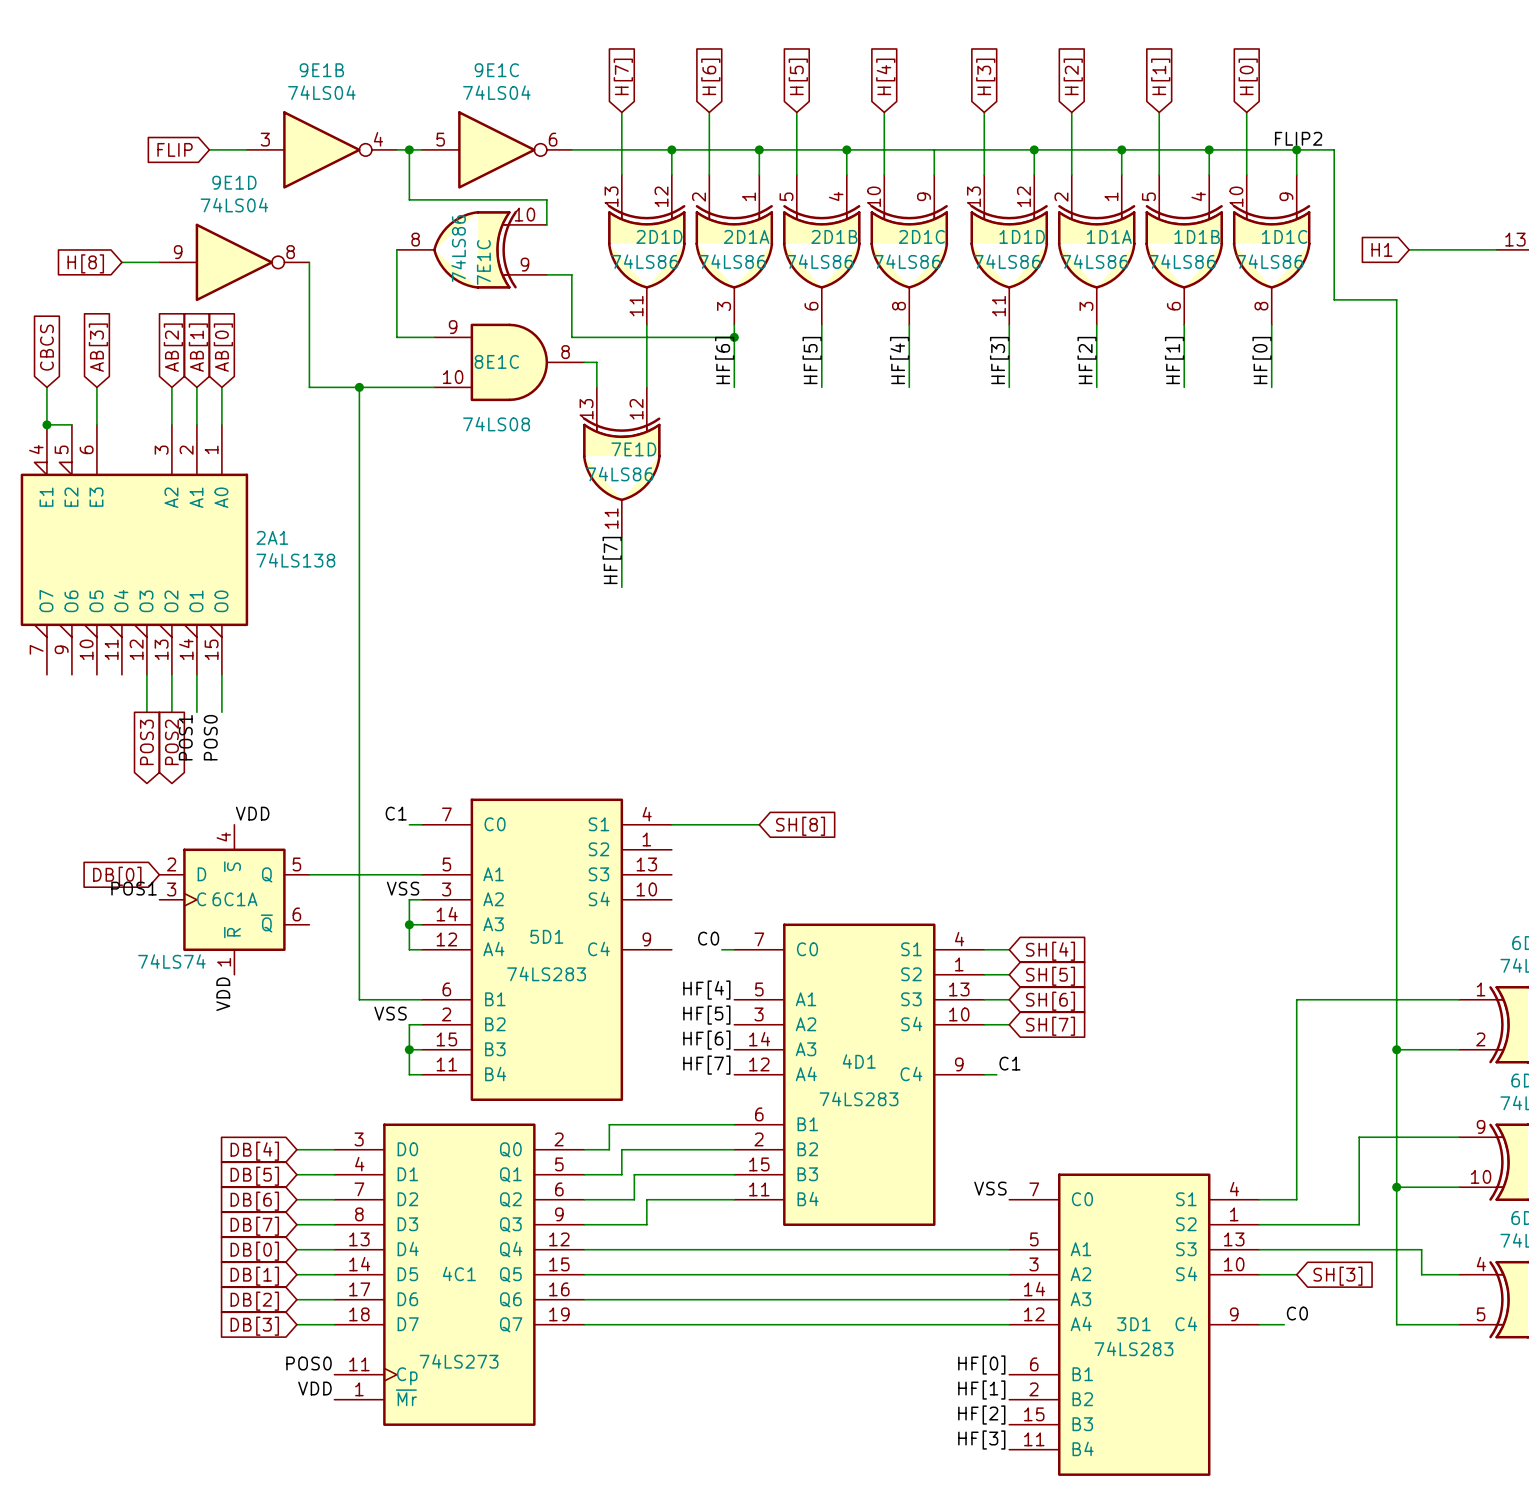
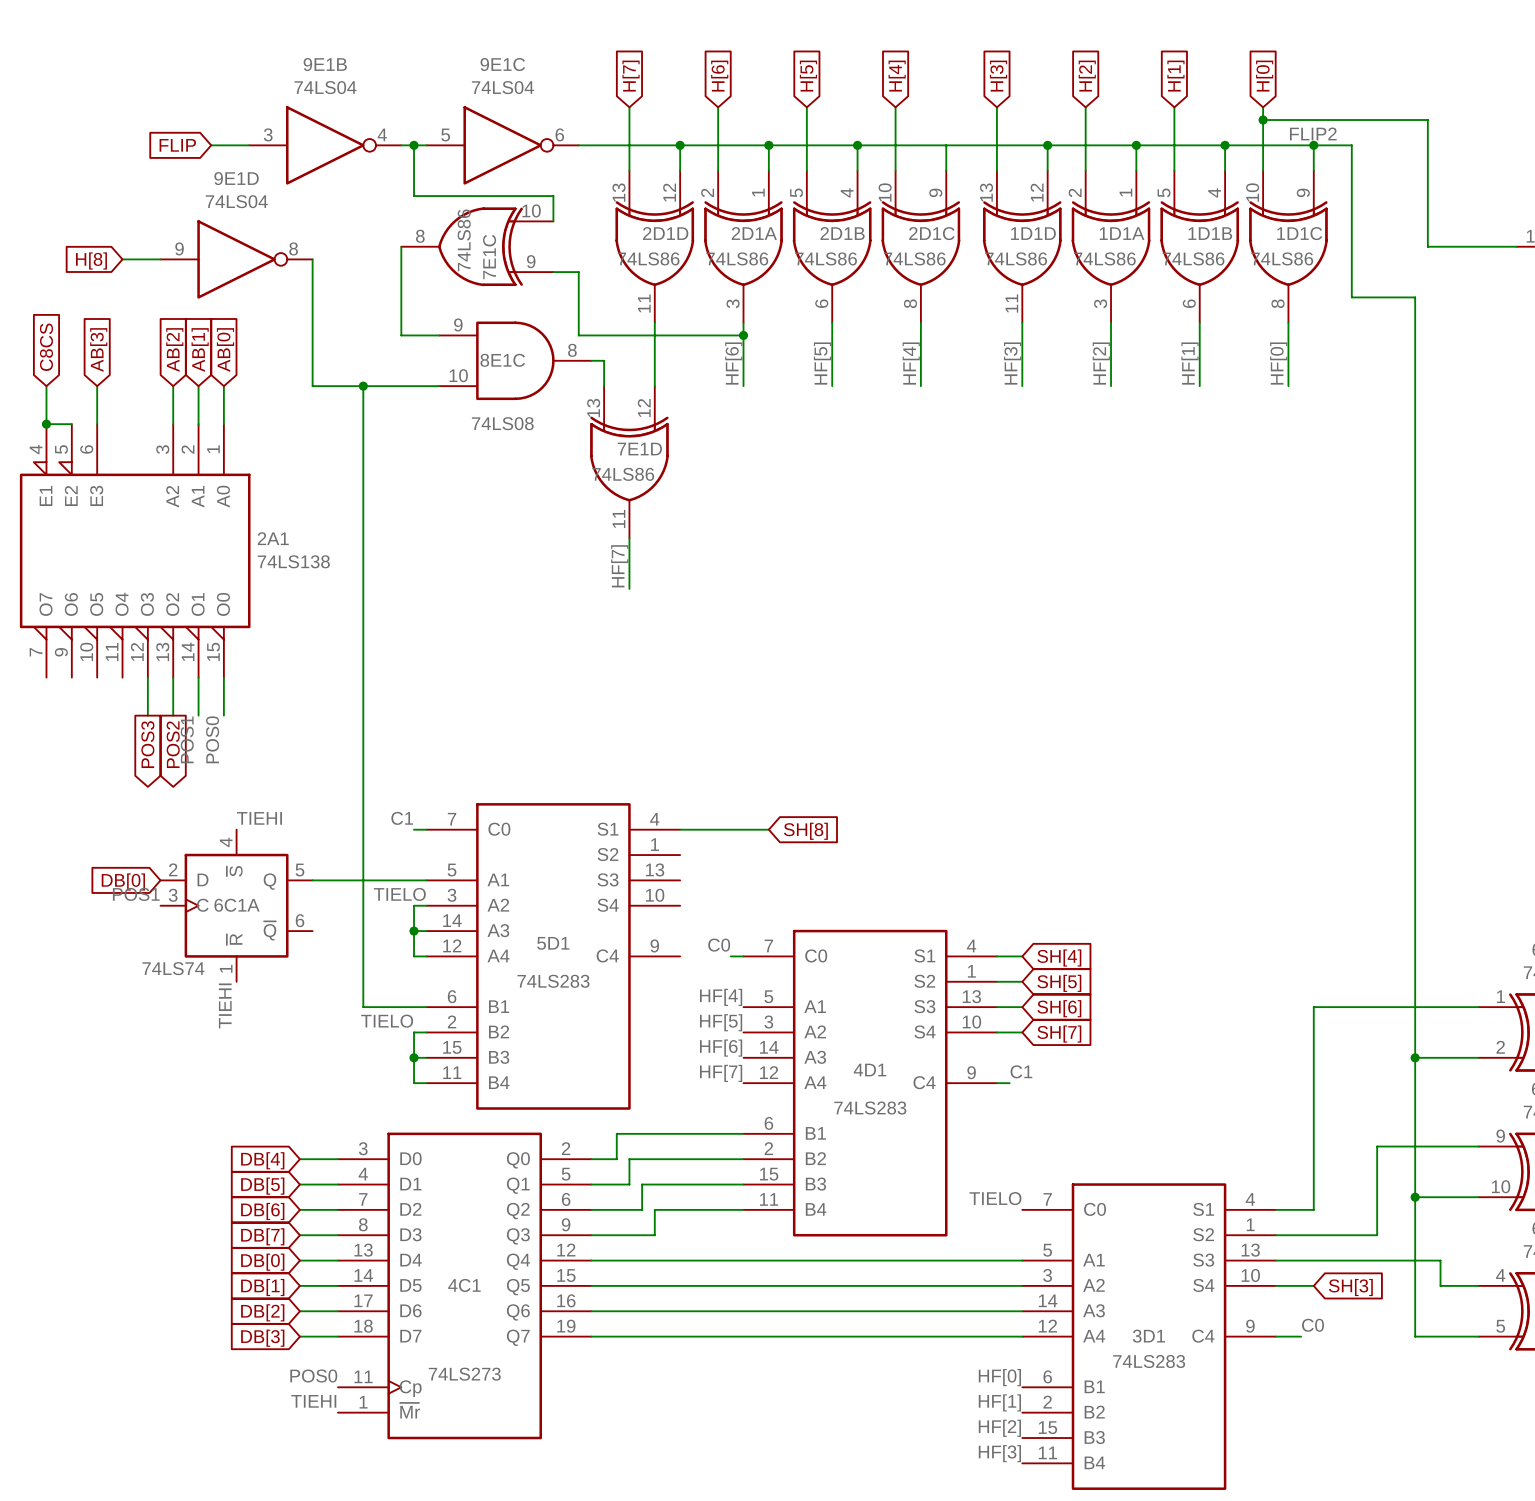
wire: none -> (1263, 120) (1427, 120) (1427, 246)
junction: none -> (1263, 120)
global label: H1 (1381, 249) -> none
global label: CBCS (46, 347) -> C8CS (46, 347)
label: VDD (252, 813) -> TIEHI (259, 818)
label: VSS (403, 888) -> TIELO (399, 894)
label: VDD (223, 994) -> TIEHI (225, 1005)
label: VSS (390, 1013) -> TIELO (387, 1021)
label: VSS (990, 1188) -> TIELO (995, 1198)
label: VDD (314, 1388) -> TIEHI (313, 1401)

